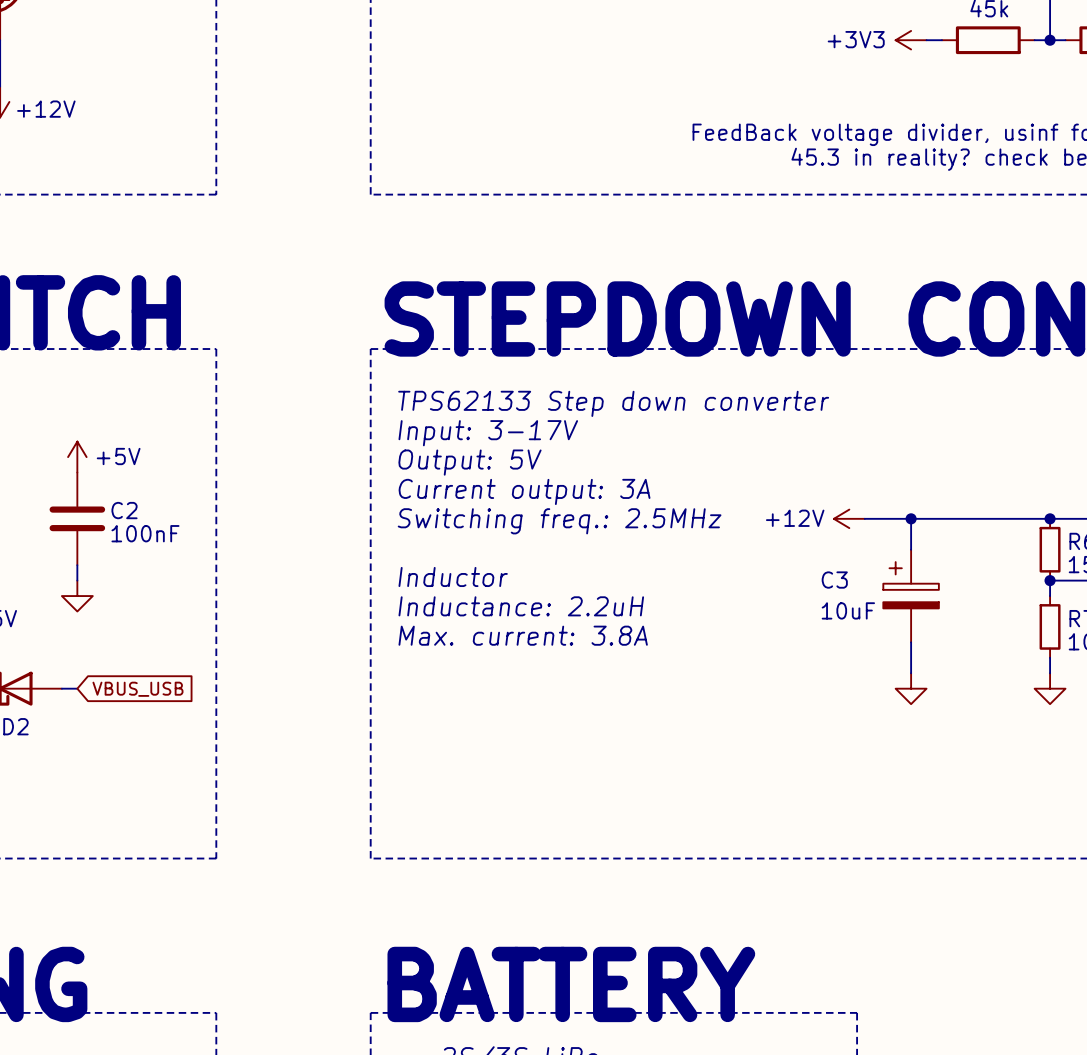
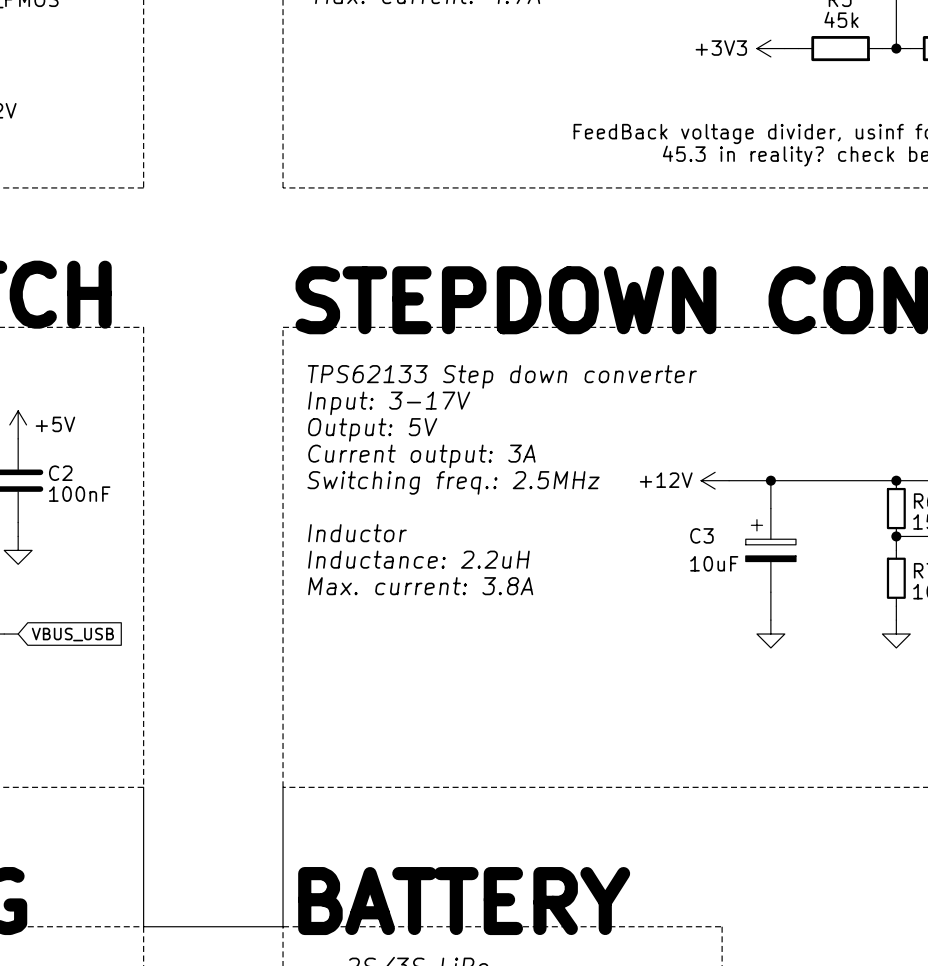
line: none -> (143, 787) (143, 926) (283, 926) (283, 787)

